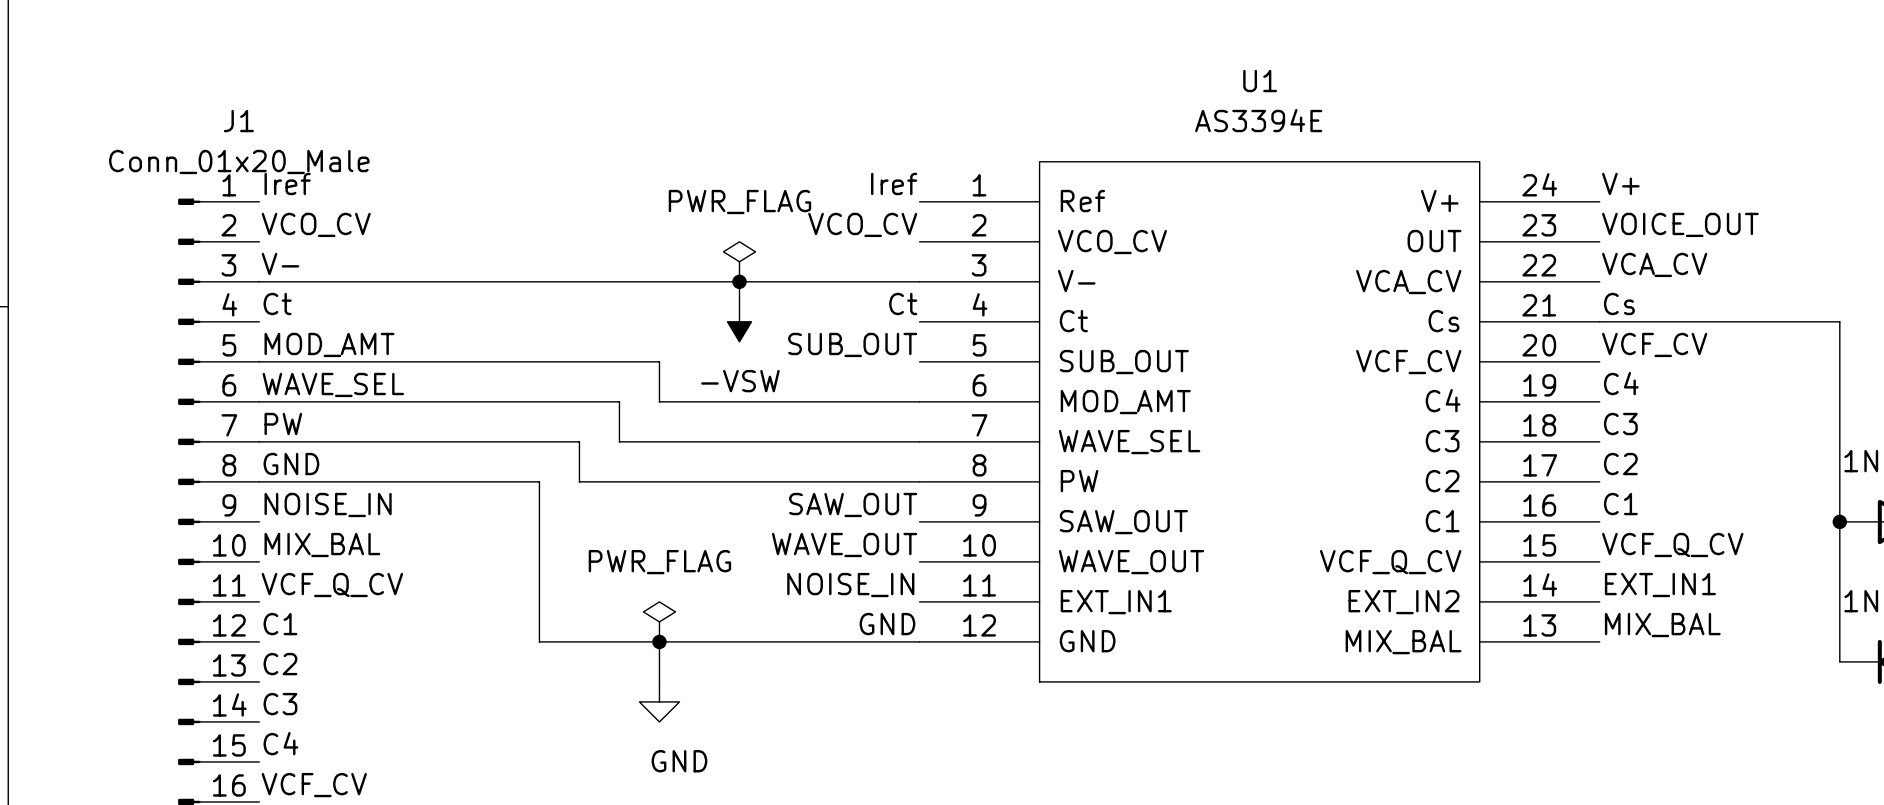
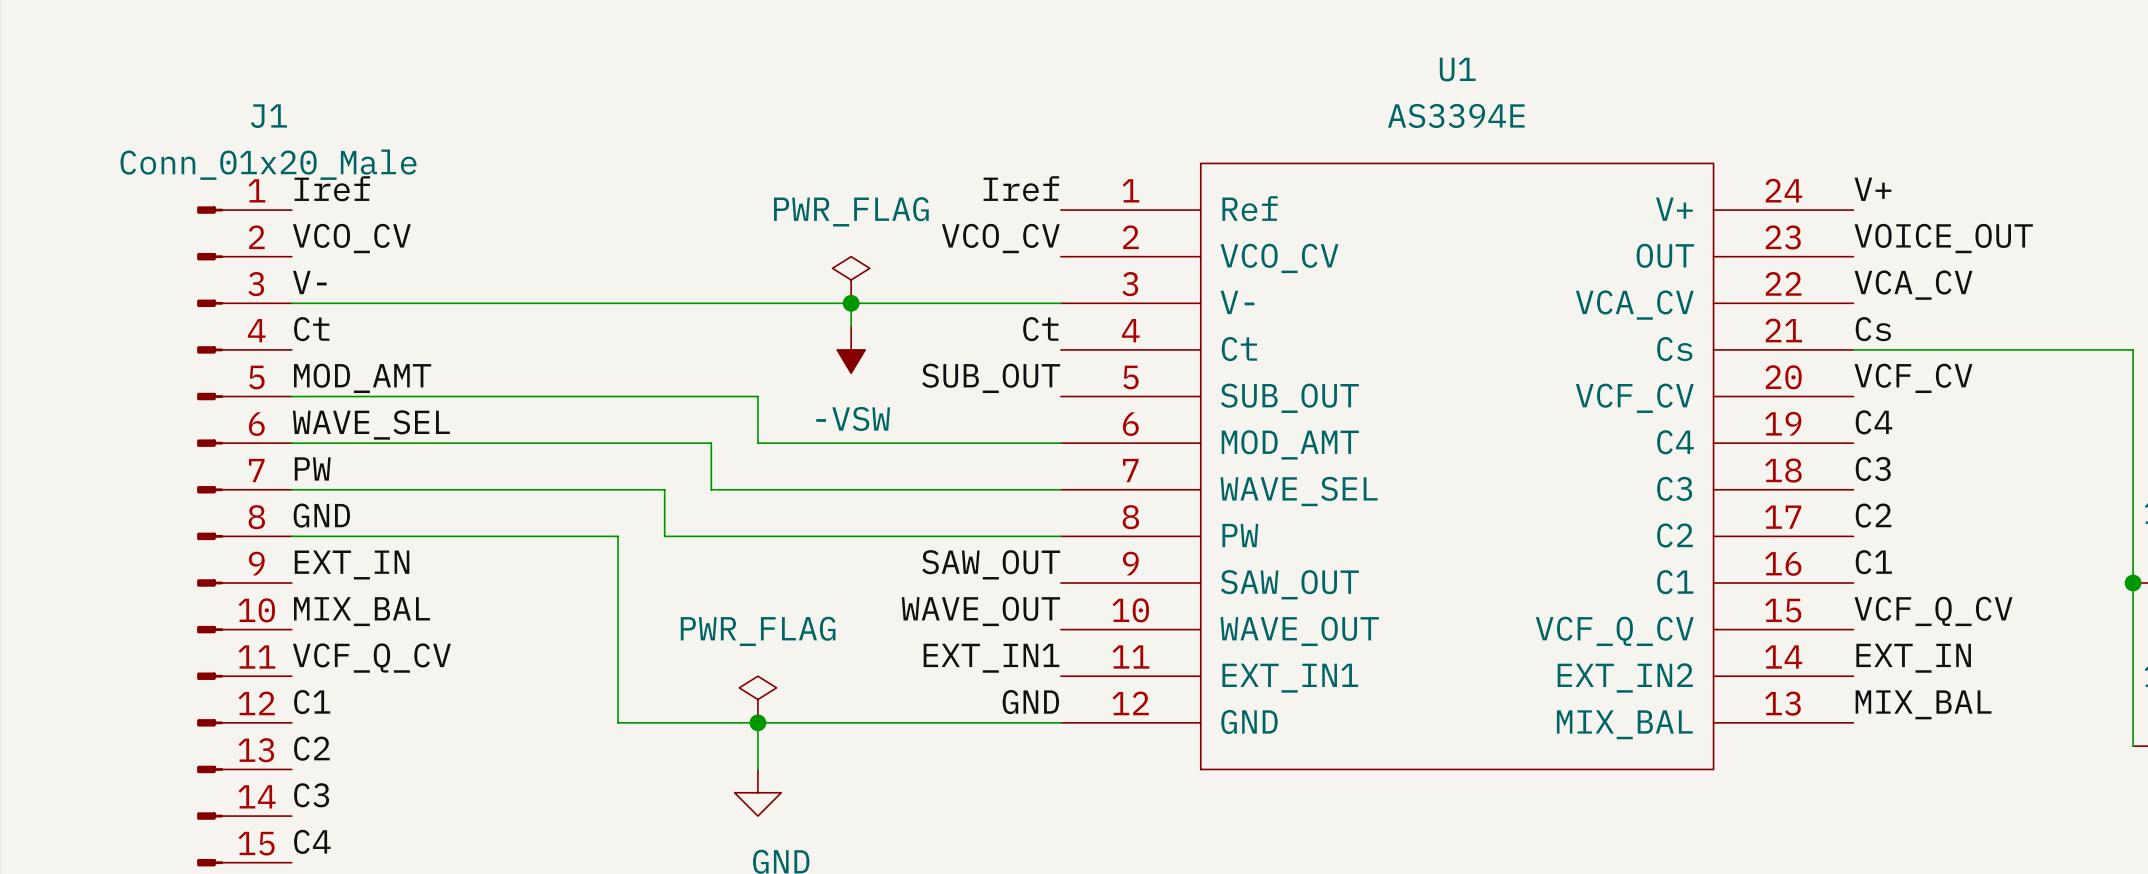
label: NOISE_IN (328, 504) -> EXT_IN (352, 565)
label: NOISE_IN (850, 585) -> EXT_IN1 (991, 658)
label: EXT_IN1 (1660, 585) -> EXT_IN (1913, 658)

